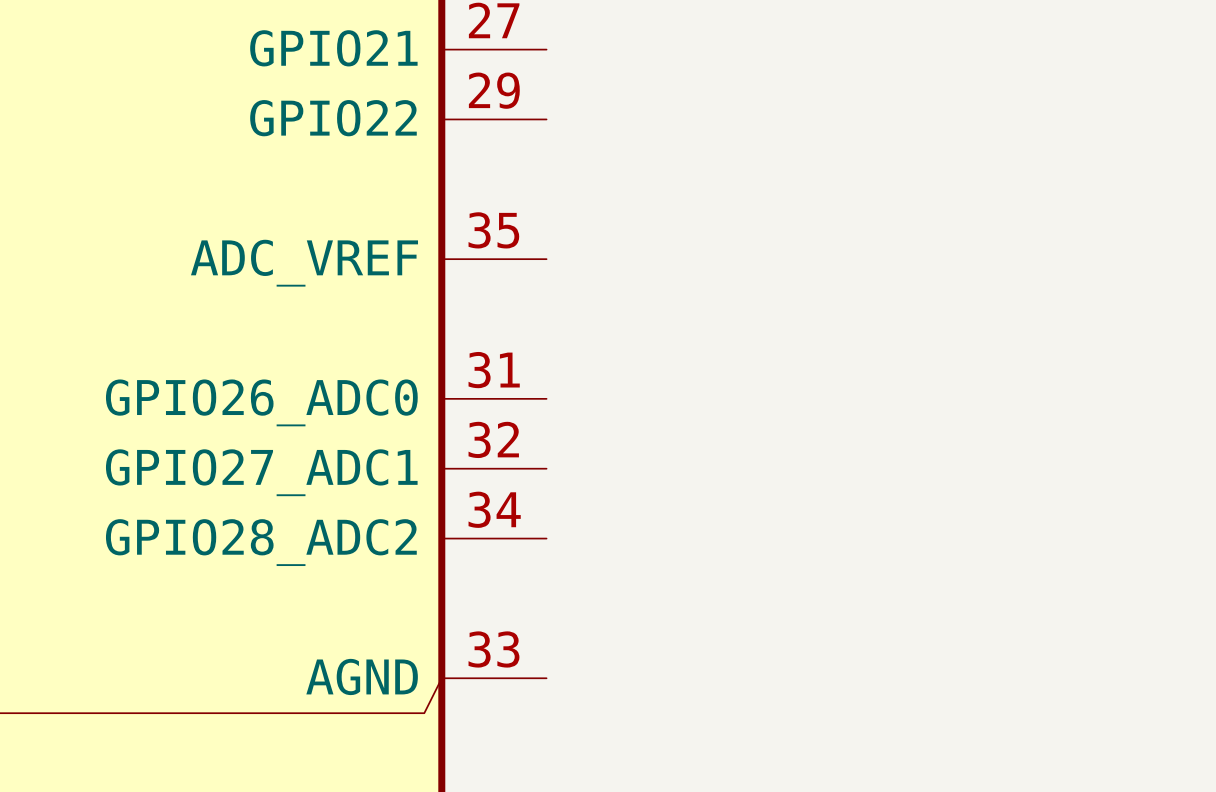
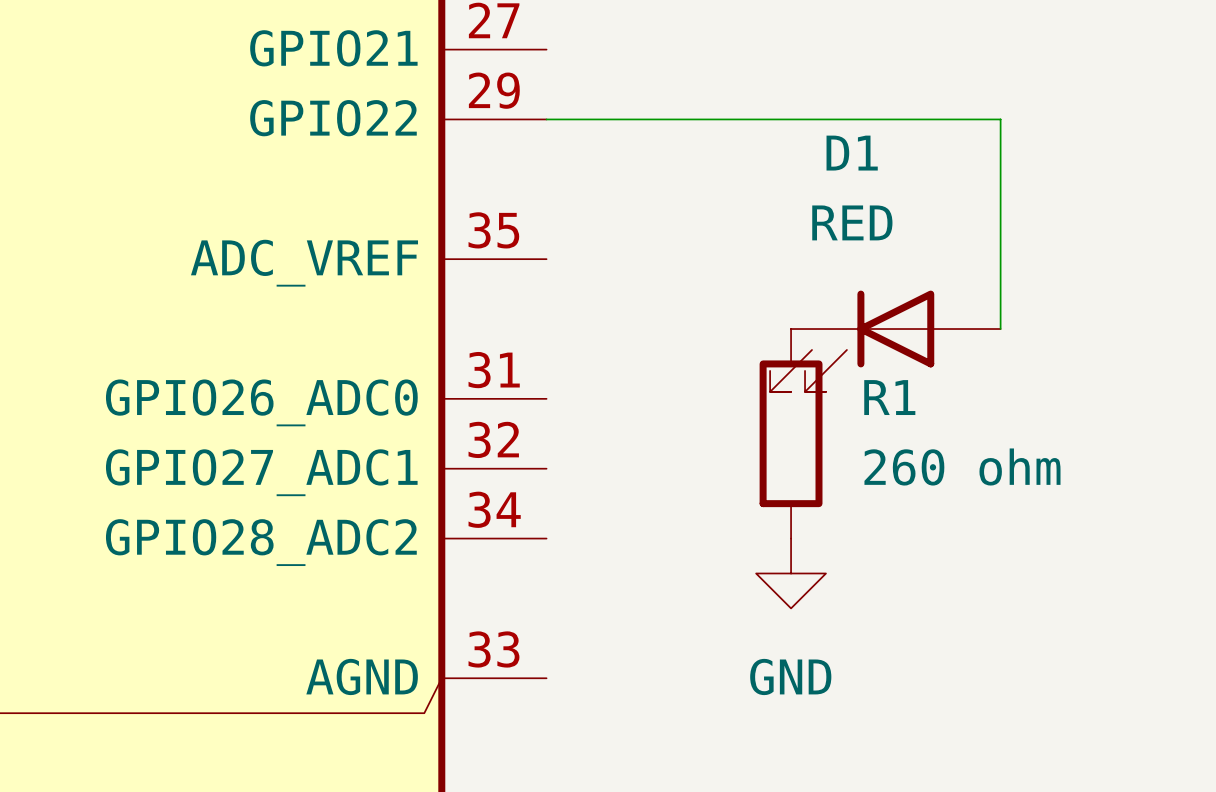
wire: none -> (546, 119) (1000, 119) (1000, 329)
D1: none -> RED (885, 341)
R1: none -> 260 ohm (791, 433)
power symbol: none -> GND (791, 573)

